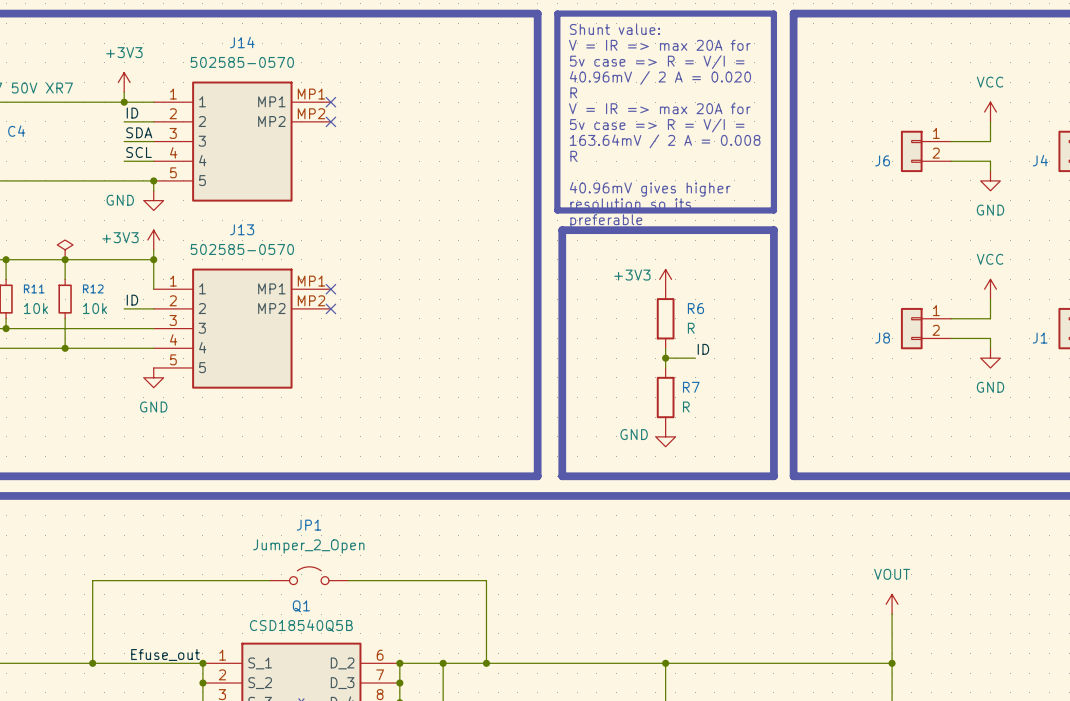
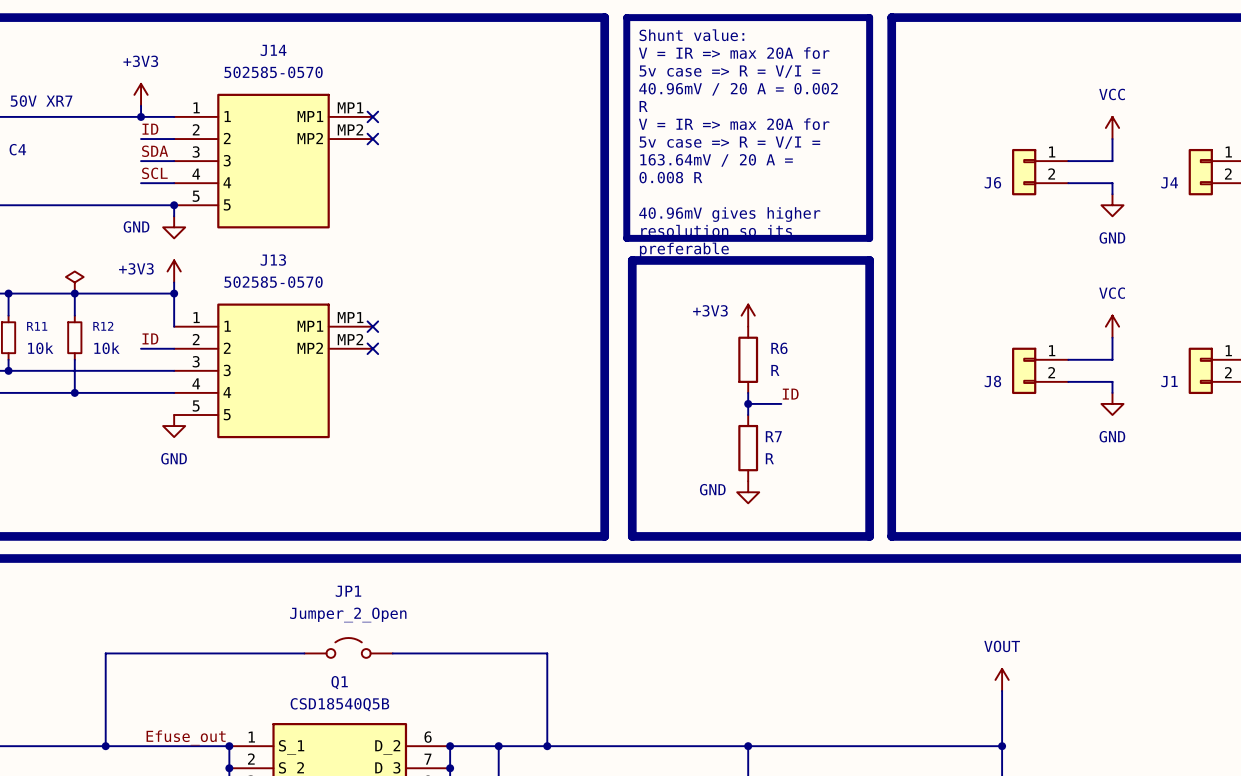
text: 40.96mV / 2 A = 0.020 (660, 77) -> 40.96mV / 20 A = 0.002 (738, 89)
text: 163.64mV / 2 A = 0.008 (665, 141) -> 163.64mV / 20 A = (716, 160)
text: R (573, 156) -> 0.008 R (670, 177)

